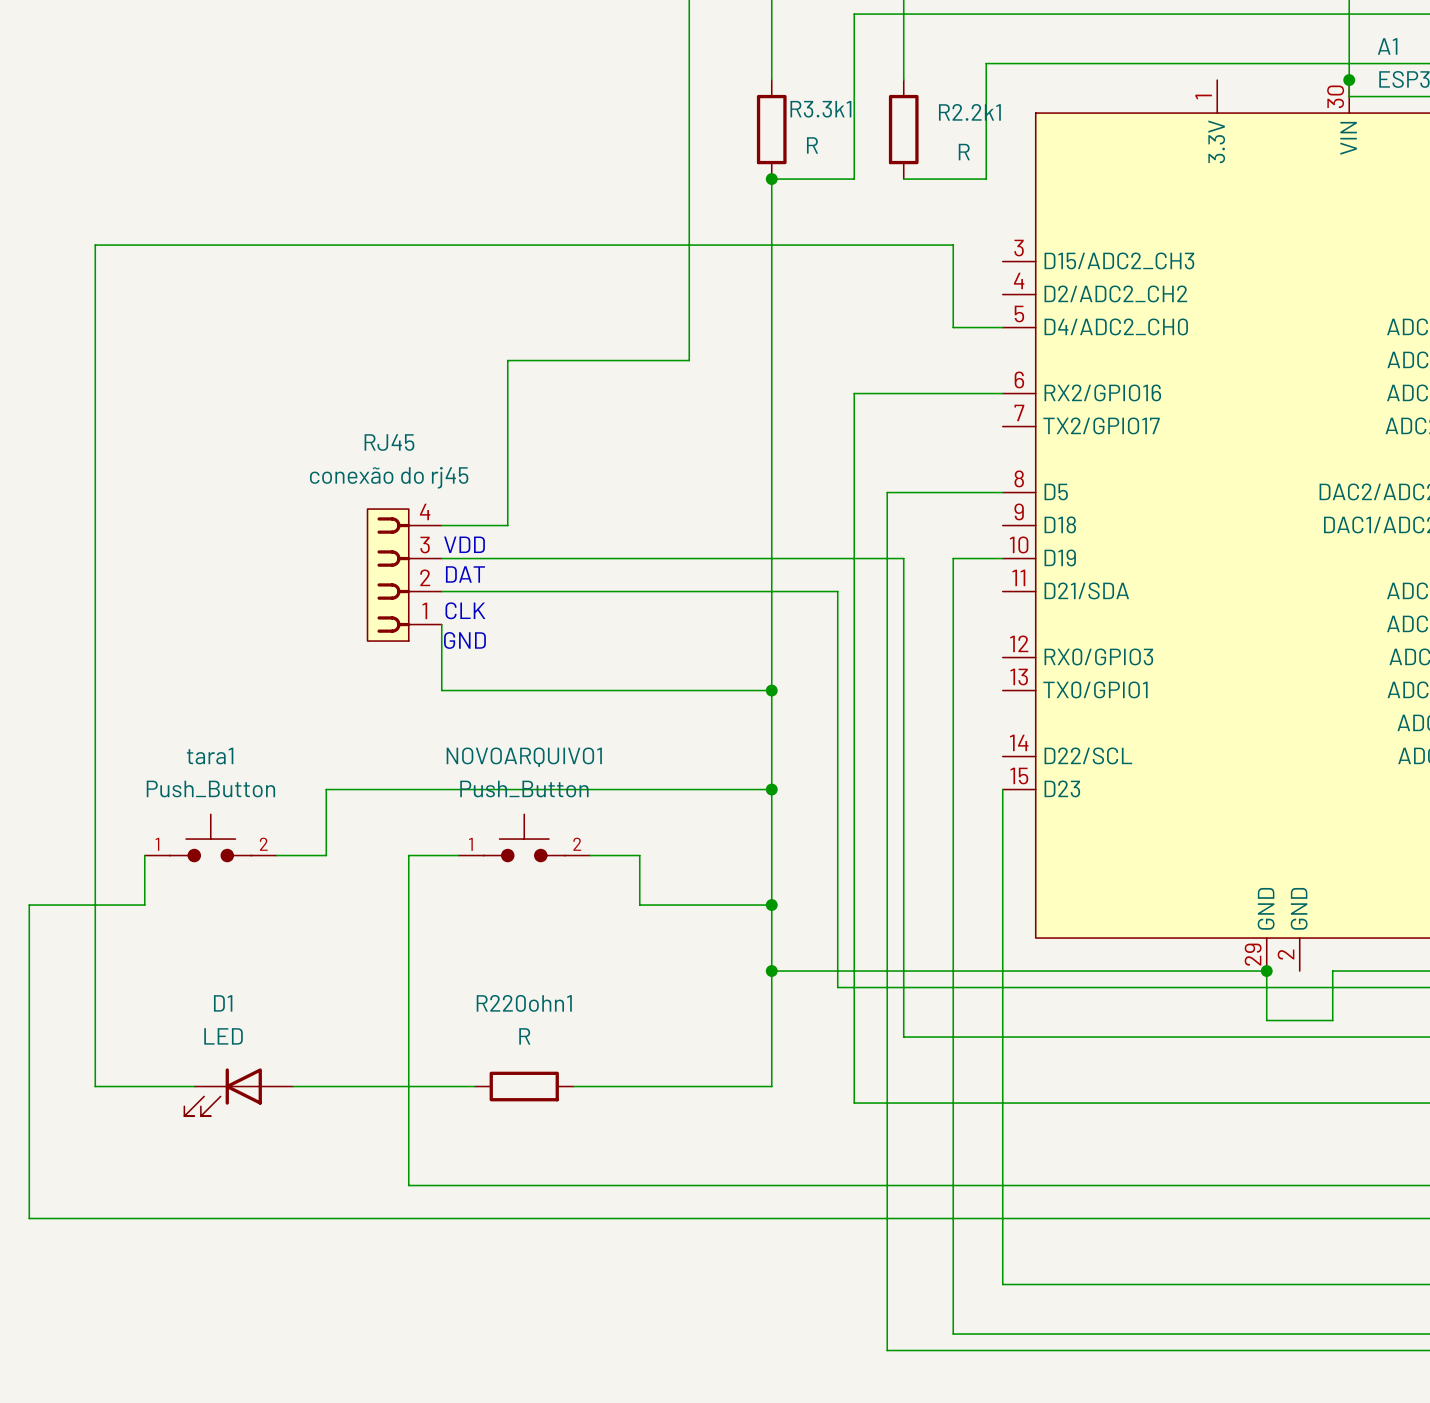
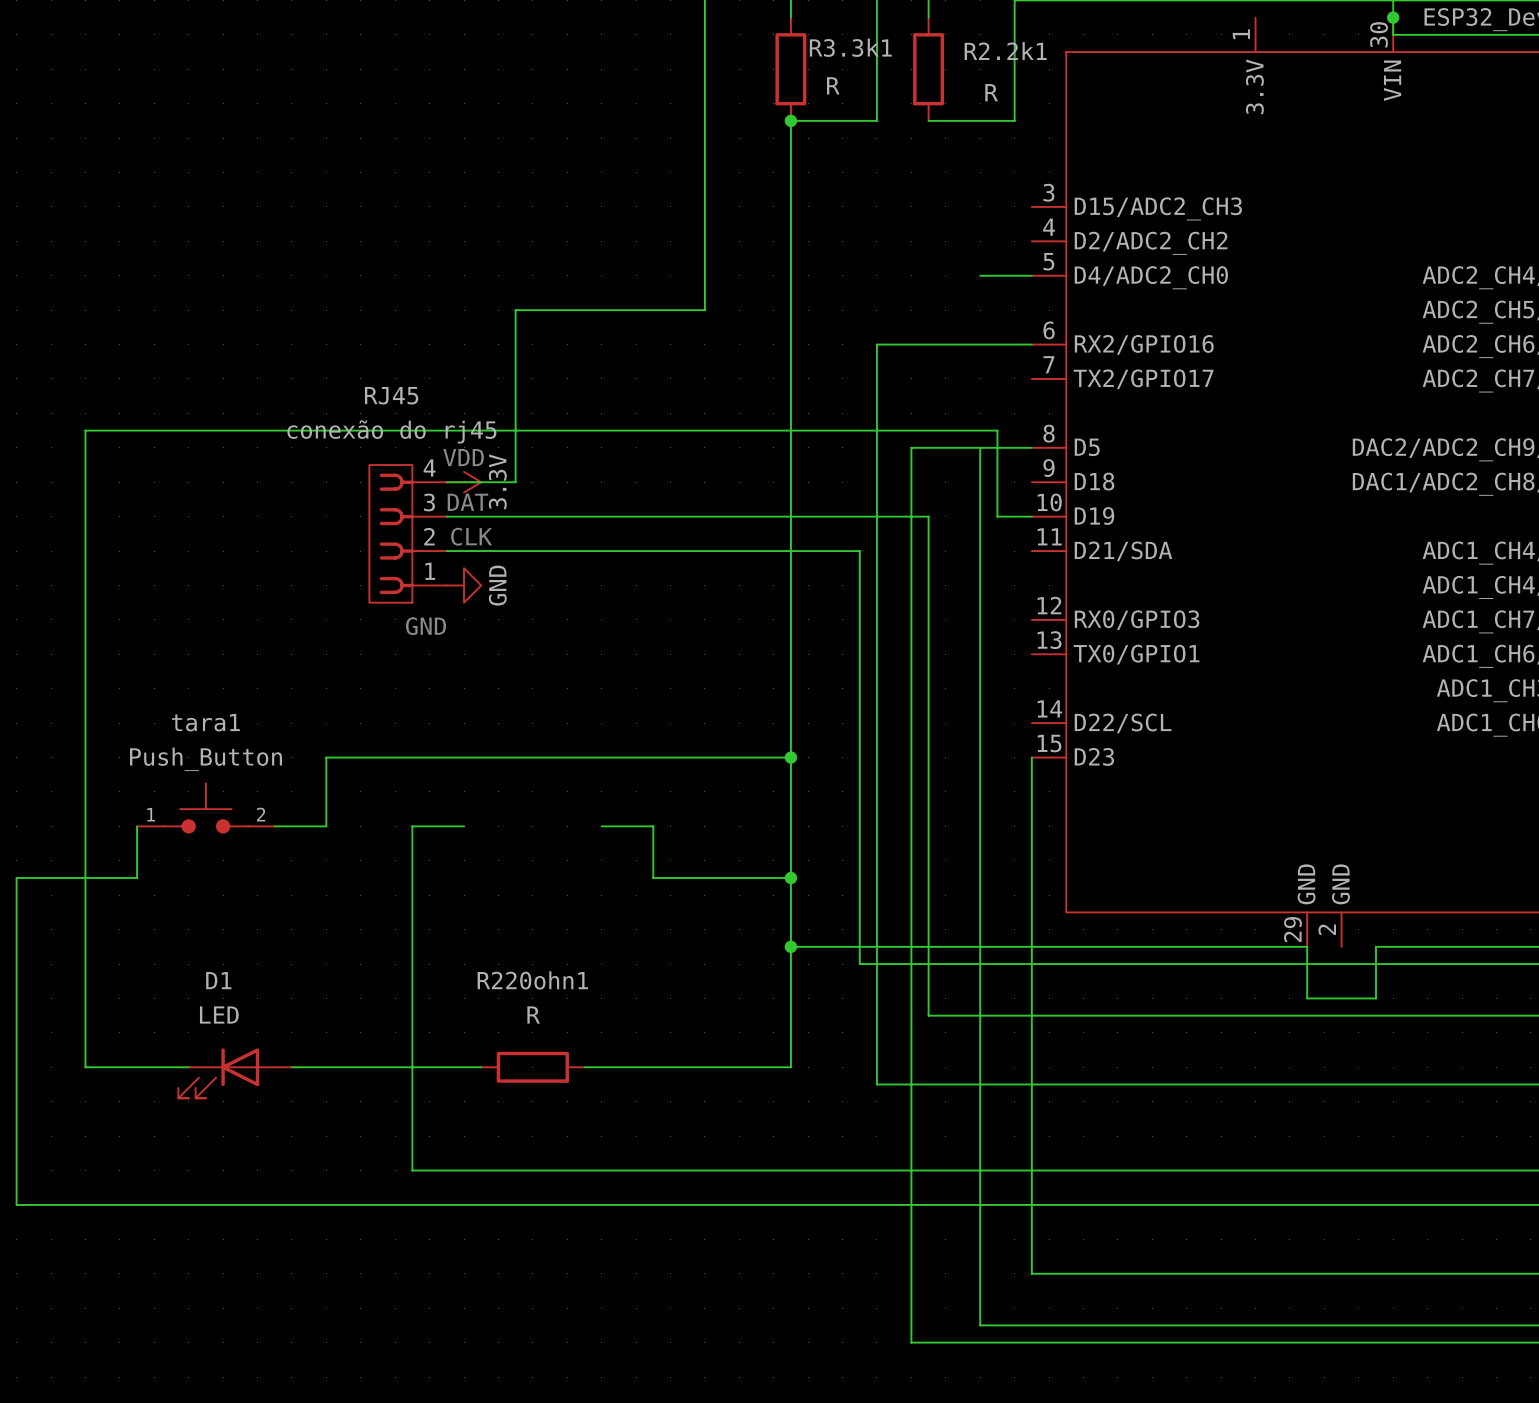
wire: (953, 327) (953, 245) (95, 245) (95, 476) -> (997, 516) (997, 430) (85, 430)
power symbol: none -> 3.3V (464, 482)
text position: VDD (464, 544) -> VDD (463, 457)
wire: (953, 558) (969, 558) -> (980, 516) (980, 447)
text position: DAT (465, 574) -> DAT (467, 502)
text position: CLK (465, 610) -> CLK (471, 536)
wire: (441, 624) (441, 690) (771, 690) -> none
power symbol: none -> GND (464, 585)
text position: GND (464, 640) -> GND (426, 626)
junction: (771, 690) -> none
NOVOARQUIVO1: Push_Button (524, 837) -> none
junction: (1266, 971) -> none

